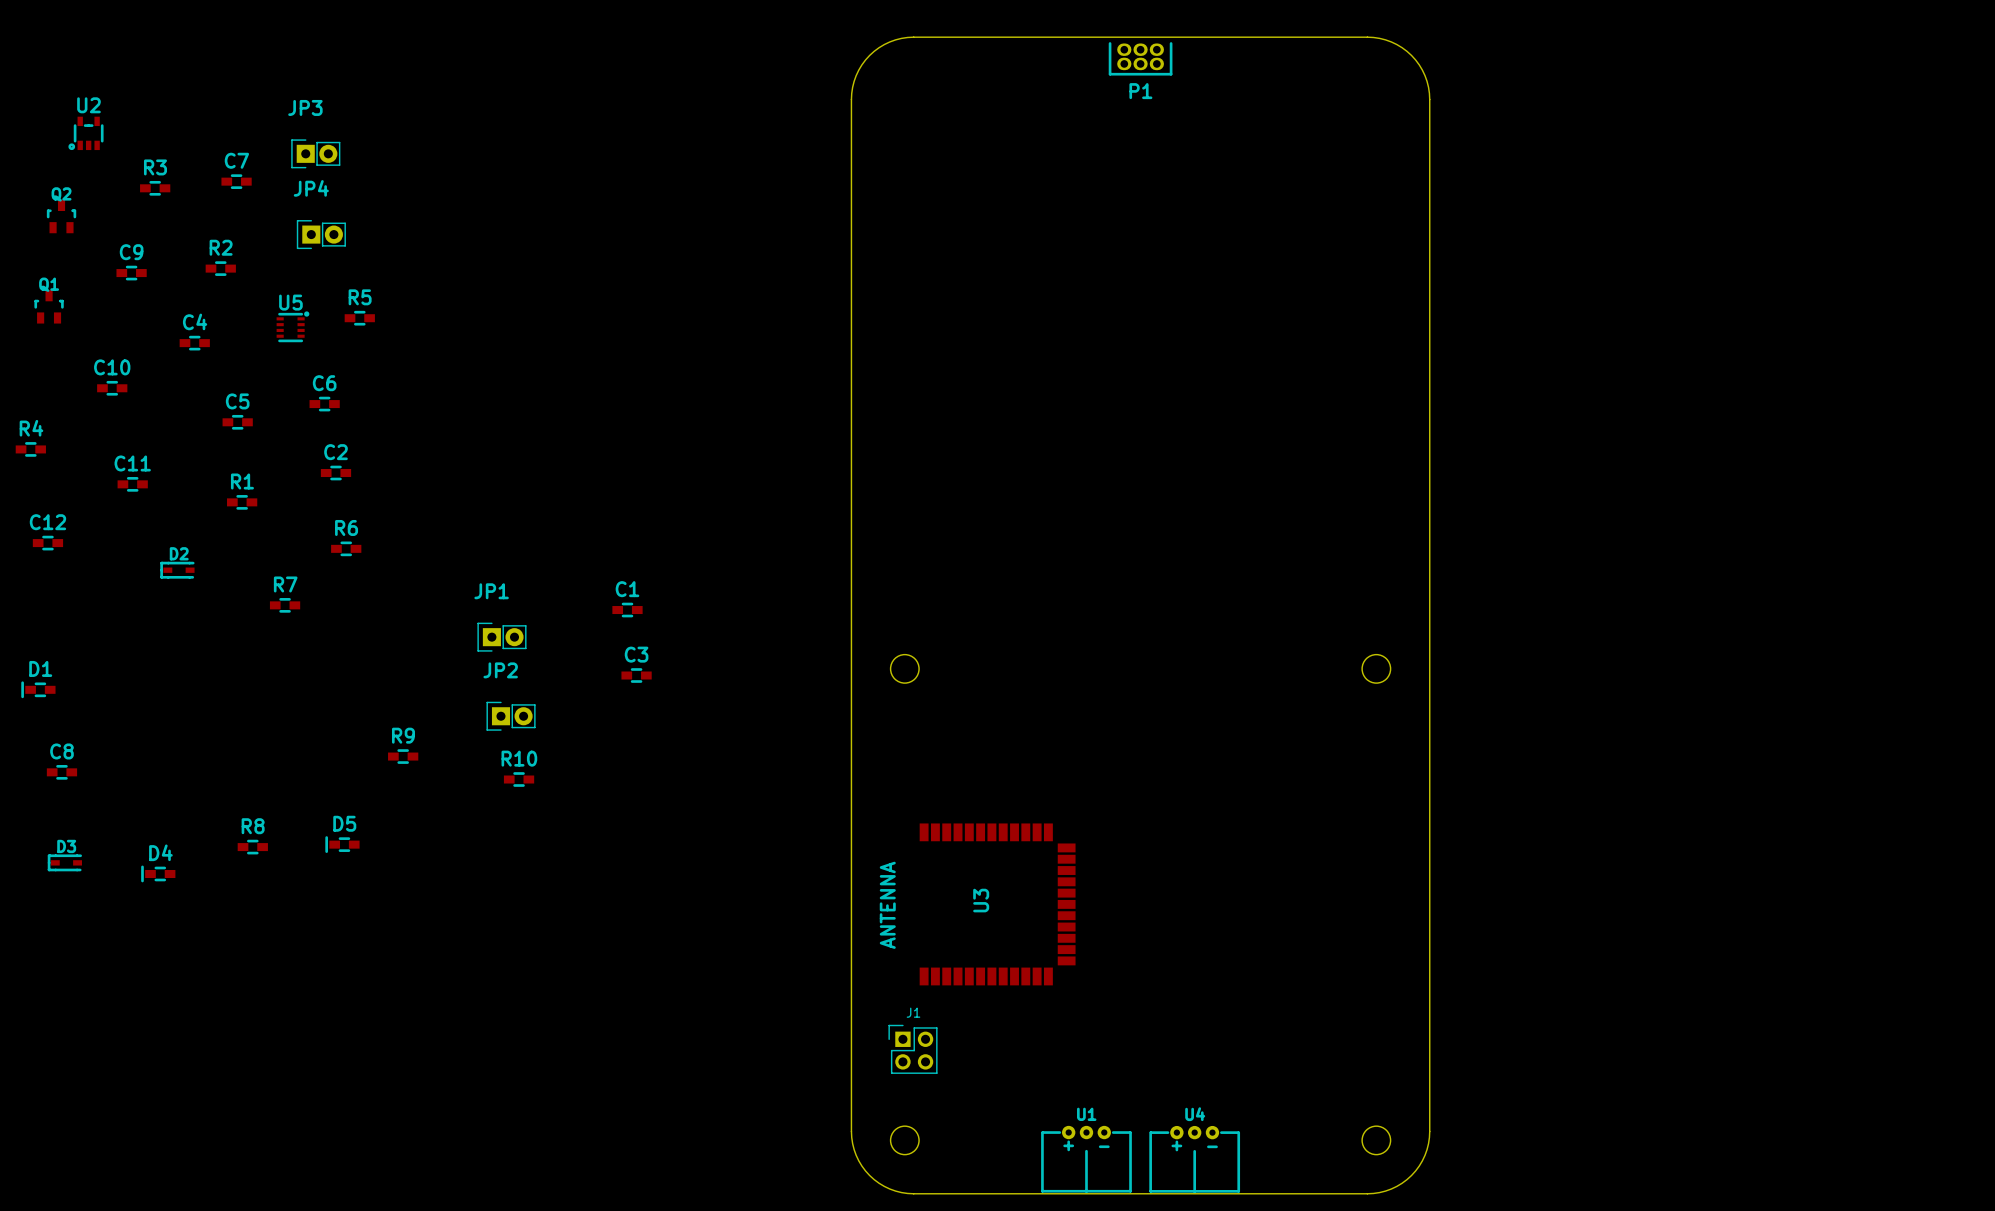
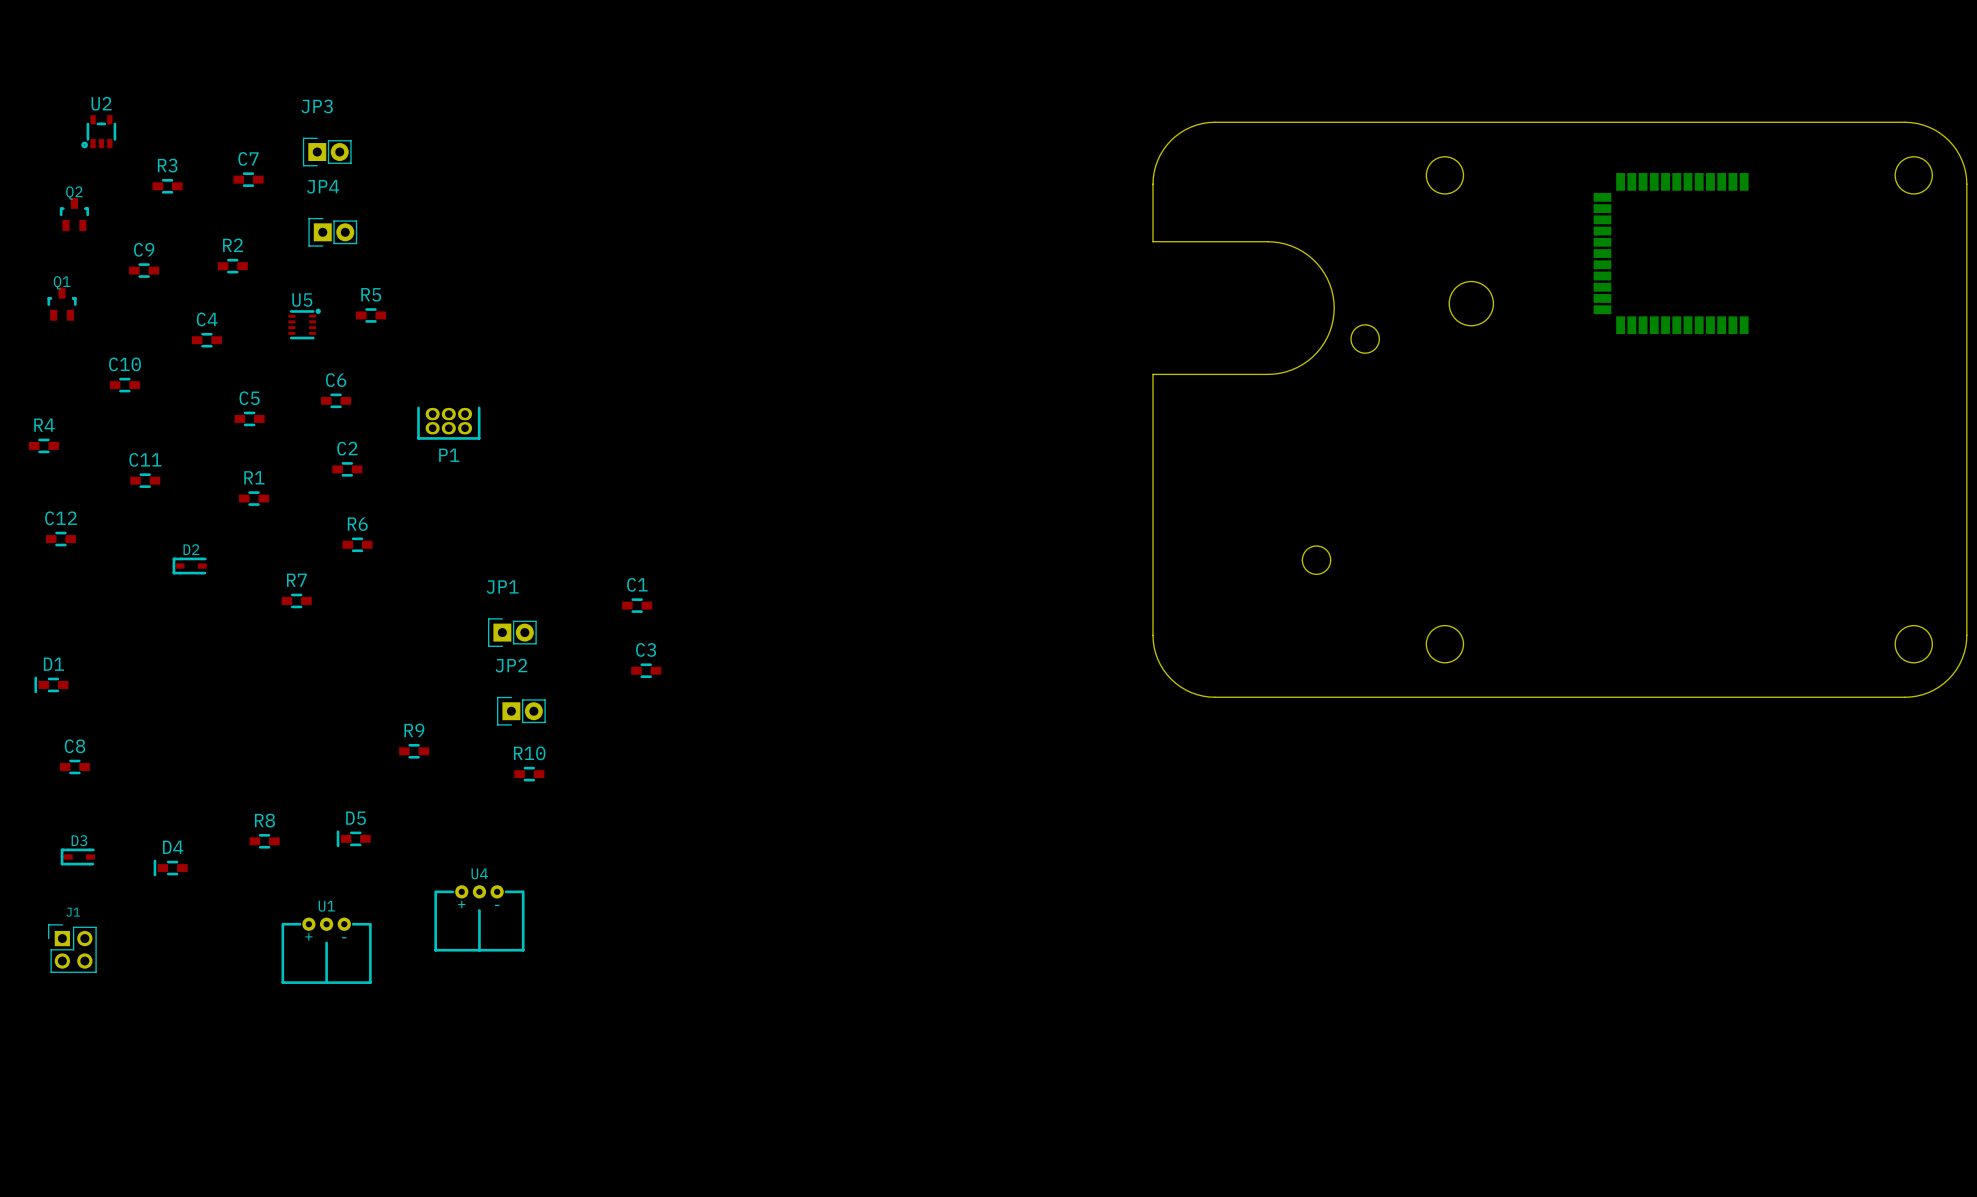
board edge: (913, 37) (1373, 37) (1391, 41) (1406, 51) (1415, 59) (1424, 75) (1429, 99) (1429, 1131) (1427, 1149) (1419, 1166) (1406, 1179) (1391, 1189) (1367, 1193) (907, 1193) (889, 1189) (874, 1179) (865, 1171) (856, 1155) (851, 1131) (851, 93) (858, 70) (874, 51) (889, 41) (913, 37) -> none
P1 position: (1140, 58) -> (448, 423)
board edge: none -> (1214, 122) (1904, 122) (1922, 124) (1944, 136) (1959, 155) (1965, 172) (1966, 184) (1966, 635) (1962, 659) (1952, 674) (1934, 689) (1916, 696) (1904, 697) (1214, 697) (1196, 694) (1175, 683) (1160, 664) (1153, 641) (1153, 374) (1267, 374) (1286, 371) (1302, 364) (1320, 348) (1329, 332) (1333, 314) (1331, 289) (1324, 273) (1307, 255) (1291, 246) (1267, 241) (1153, 241) (1153, 178) (1160, 155) (1171, 140) (1185, 129) (1196, 124) (1214, 122)
round board edge: none -> [1425, 156, 1464, 195]
round board edge: none -> [1894, 156, 1933, 195]
part: none -> (1671, 253)
round board edge: none -> [1448, 281, 1494, 327]
round board edge: none -> [1350, 324, 1380, 354]
round board edge: none -> [1425, 625, 1464, 664]
round board edge: none -> [1894, 625, 1933, 664]
round board edge: [890, 654, 920, 684] -> none
round board edge position: (1376, 668) -> (1316, 560)
U3: (997, 904) -> none
J1 position: (913, 1049) -> (72, 948)
round board edge: [890, 1125, 920, 1156] -> none
round board edge: [1361, 1125, 1392, 1156] -> none
U1 position: (1086, 1159) -> (326, 950)
U4 position: (1194, 1159) -> (479, 918)

